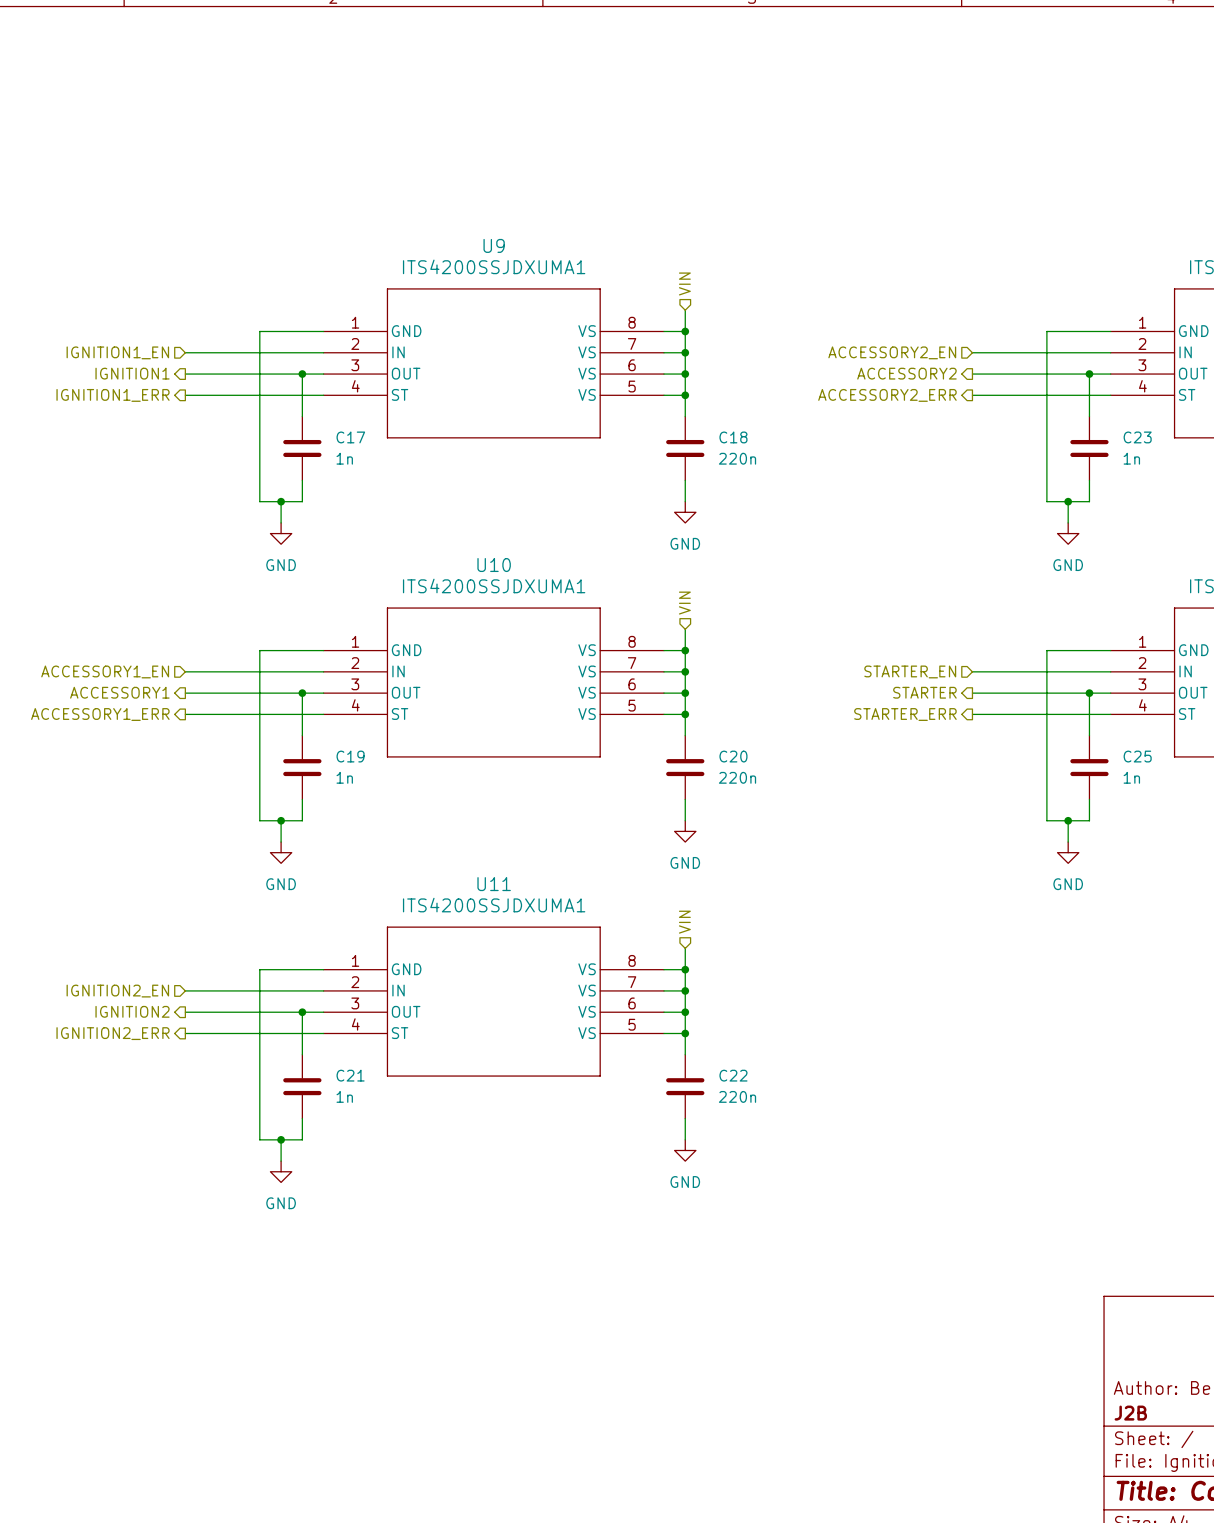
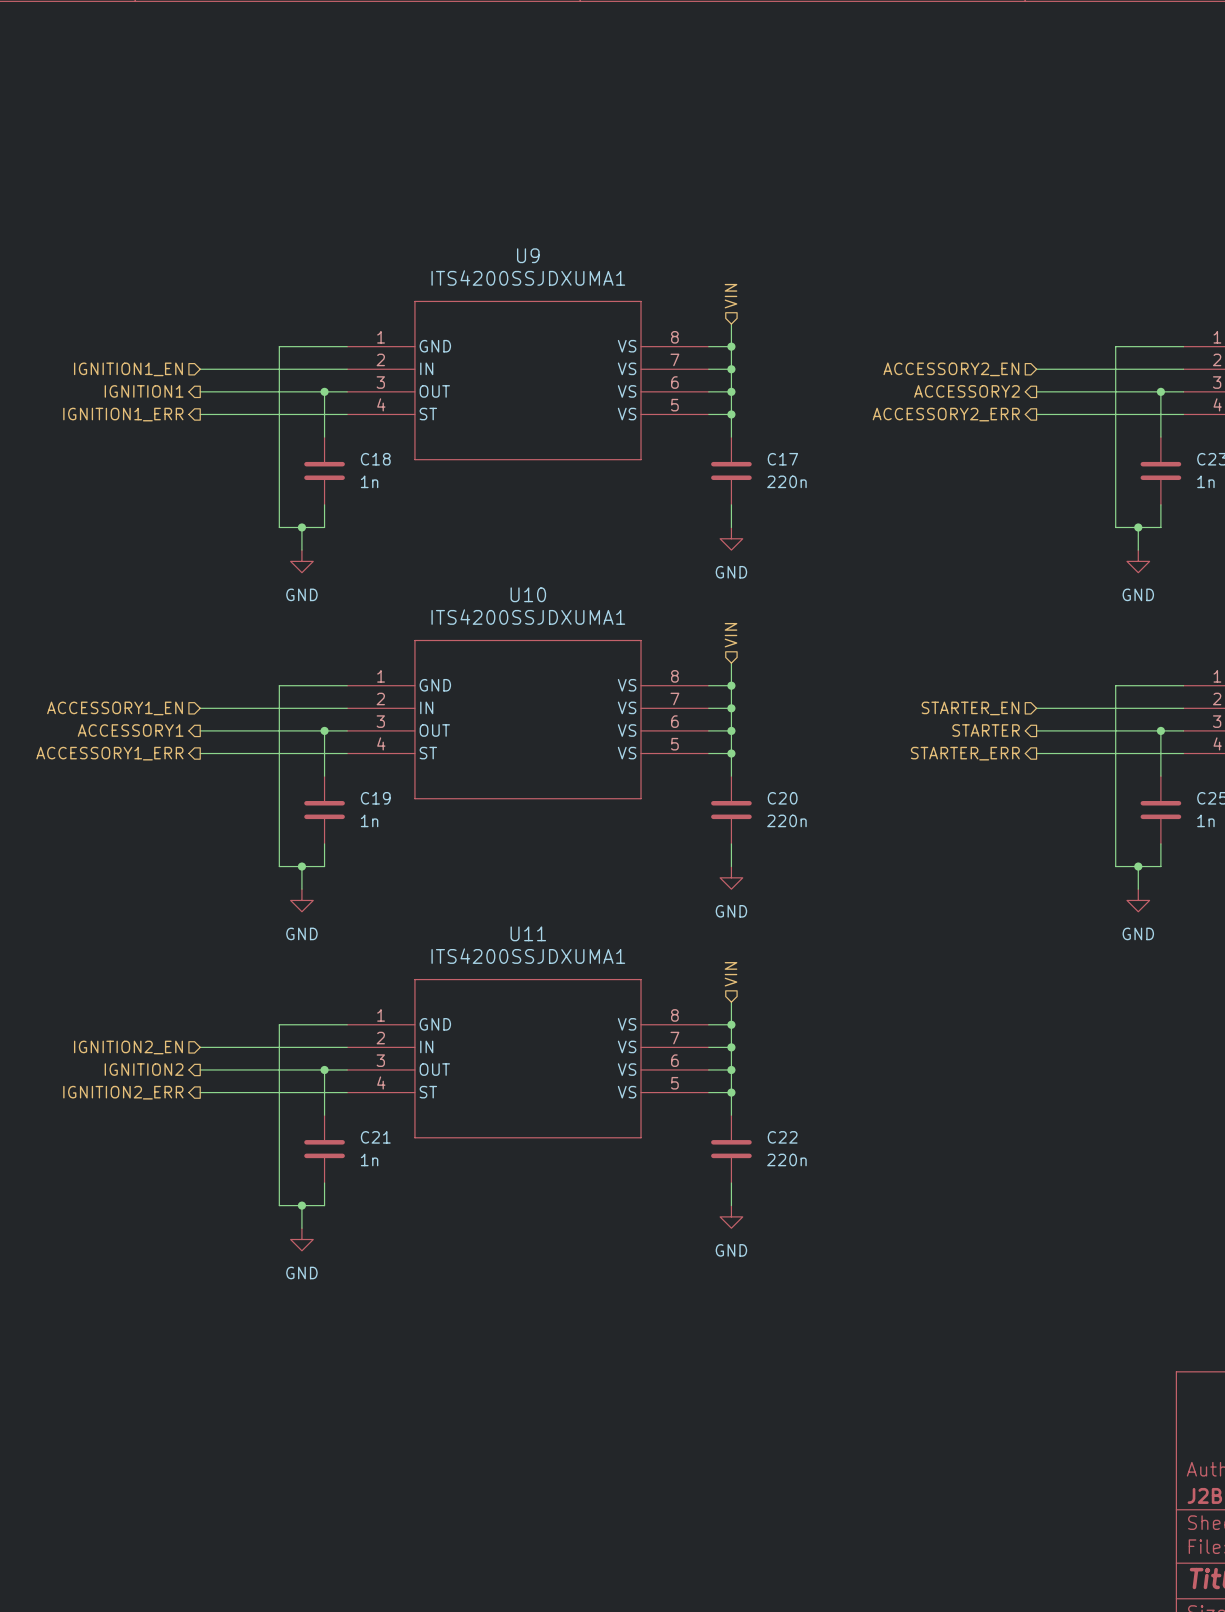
C17 name: C17 (350, 437) -> C18 (375, 459)
C18 name: C18 (733, 437) -> C17 (782, 459)

